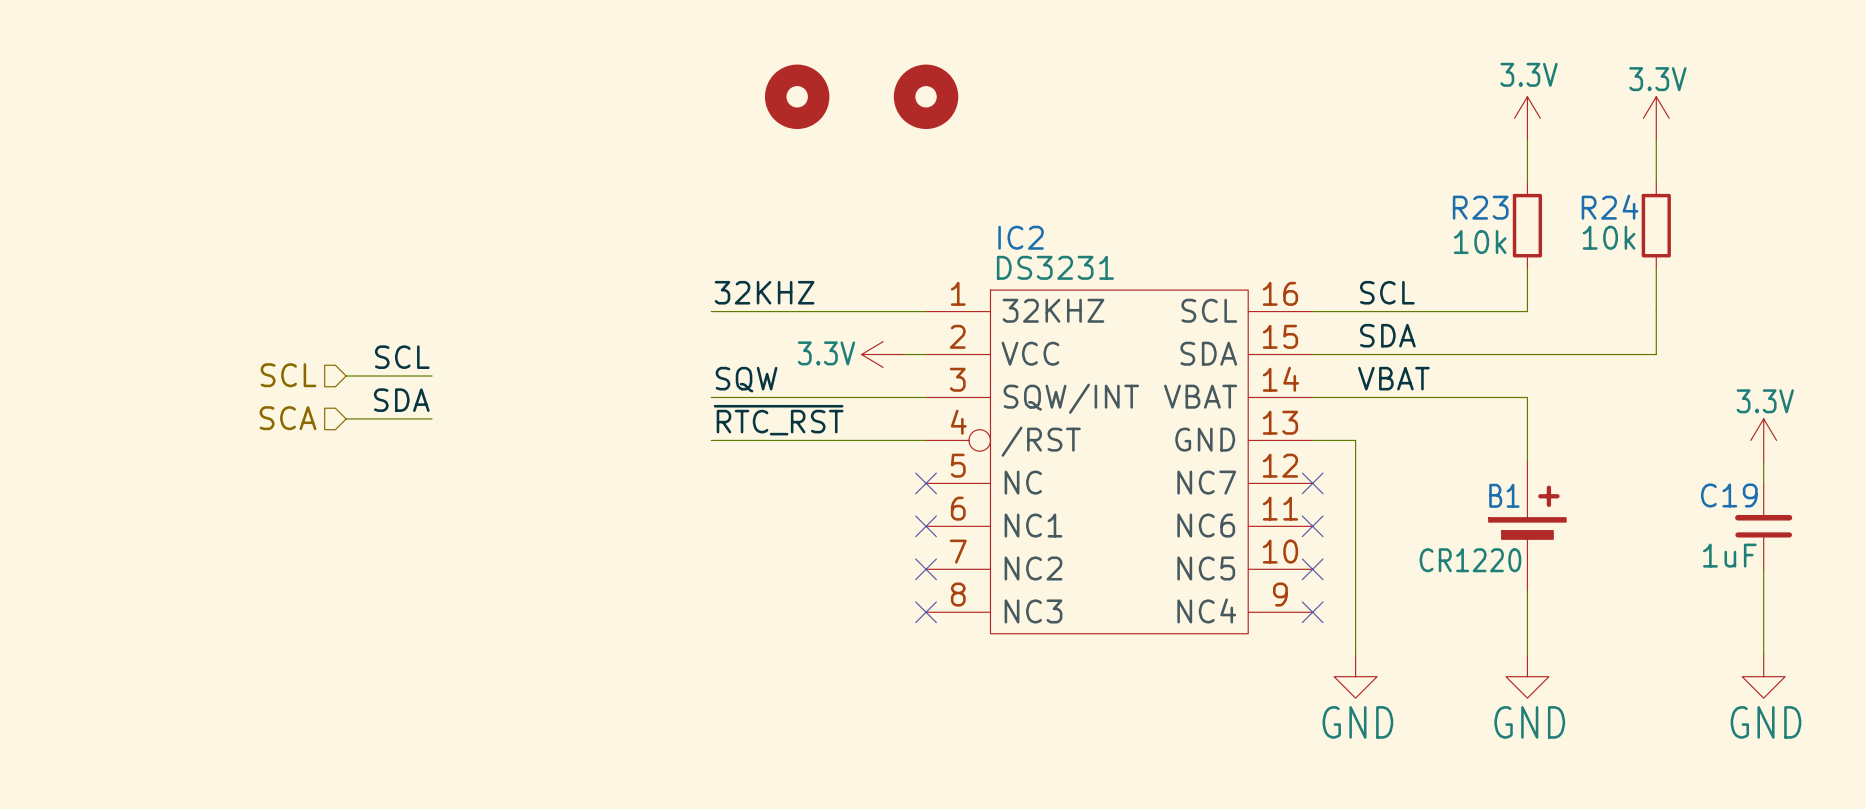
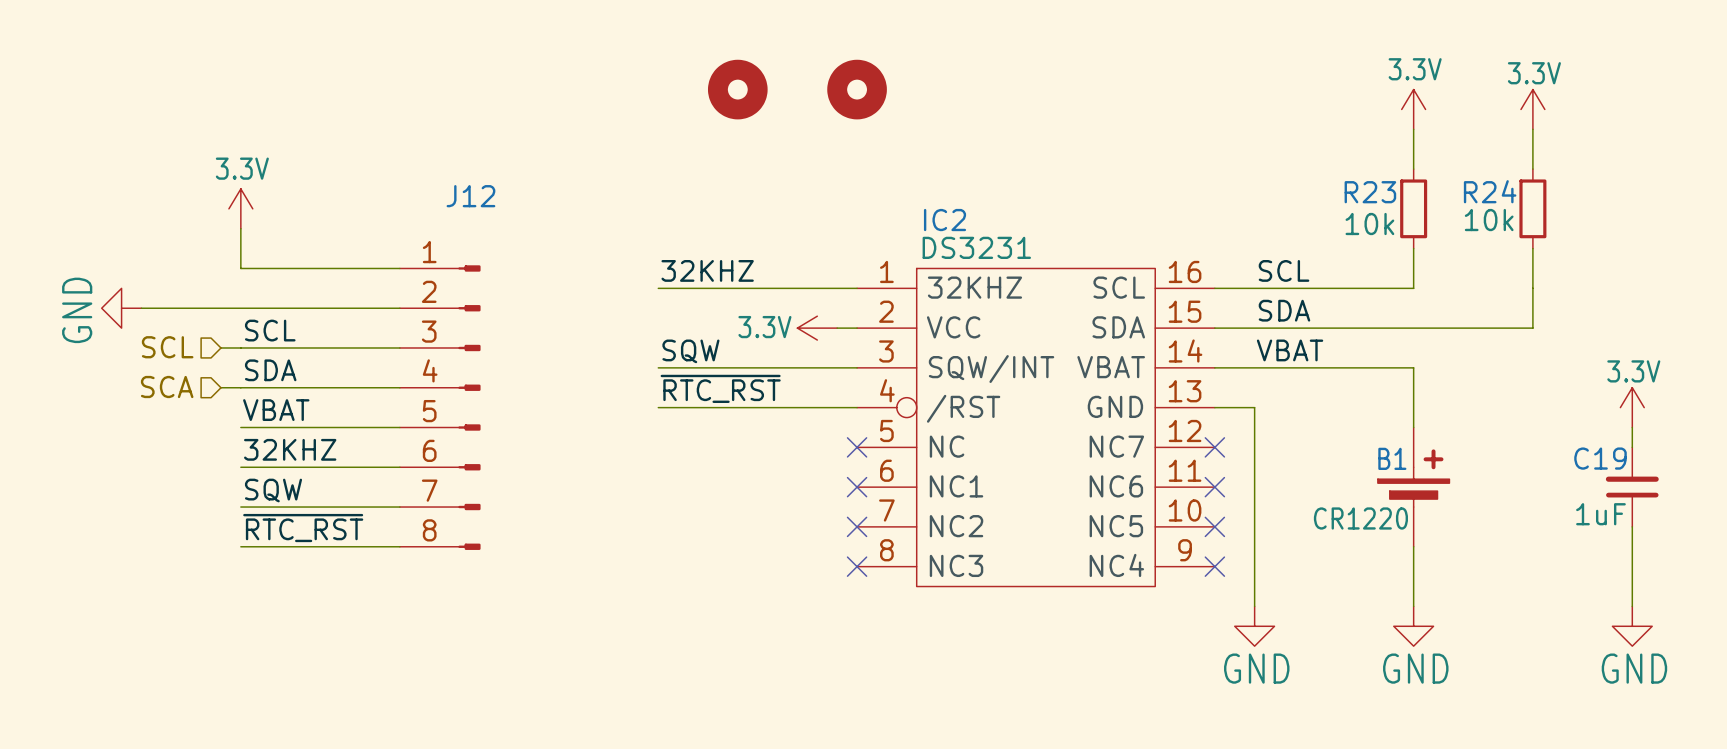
power symbol: none -> 3.3V (240, 208)
wire: none -> (240, 228) (240, 268) (399, 268)
power symbol: none -> GND (121, 308)
wire: none -> (141, 308) (399, 308)
label position: SCL (402, 357) -> SCL (270, 330)
hierarchical label position: SCL (288, 375) -> SCL (167, 347)
wire: none -> (220, 347) (320, 347)
label position: SDA (401, 400) -> SDA (270, 370)
wire: none -> (220, 387) (320, 387)
hierarchical label position: SCA (288, 418) -> SCA (167, 387)
J12: none -> (440, 407)
label: none -> VBAT (276, 410)
wire: none -> (240, 427) (399, 427)
label: none -> 32KHZ (290, 449)
wire: none -> (240, 467) (399, 467)
label: none -> SQW (273, 490)
wire: none -> (240, 507) (399, 507)
label: none -> ~{RTC_RST} (303, 528)
wire: none -> (240, 546) (399, 546)

